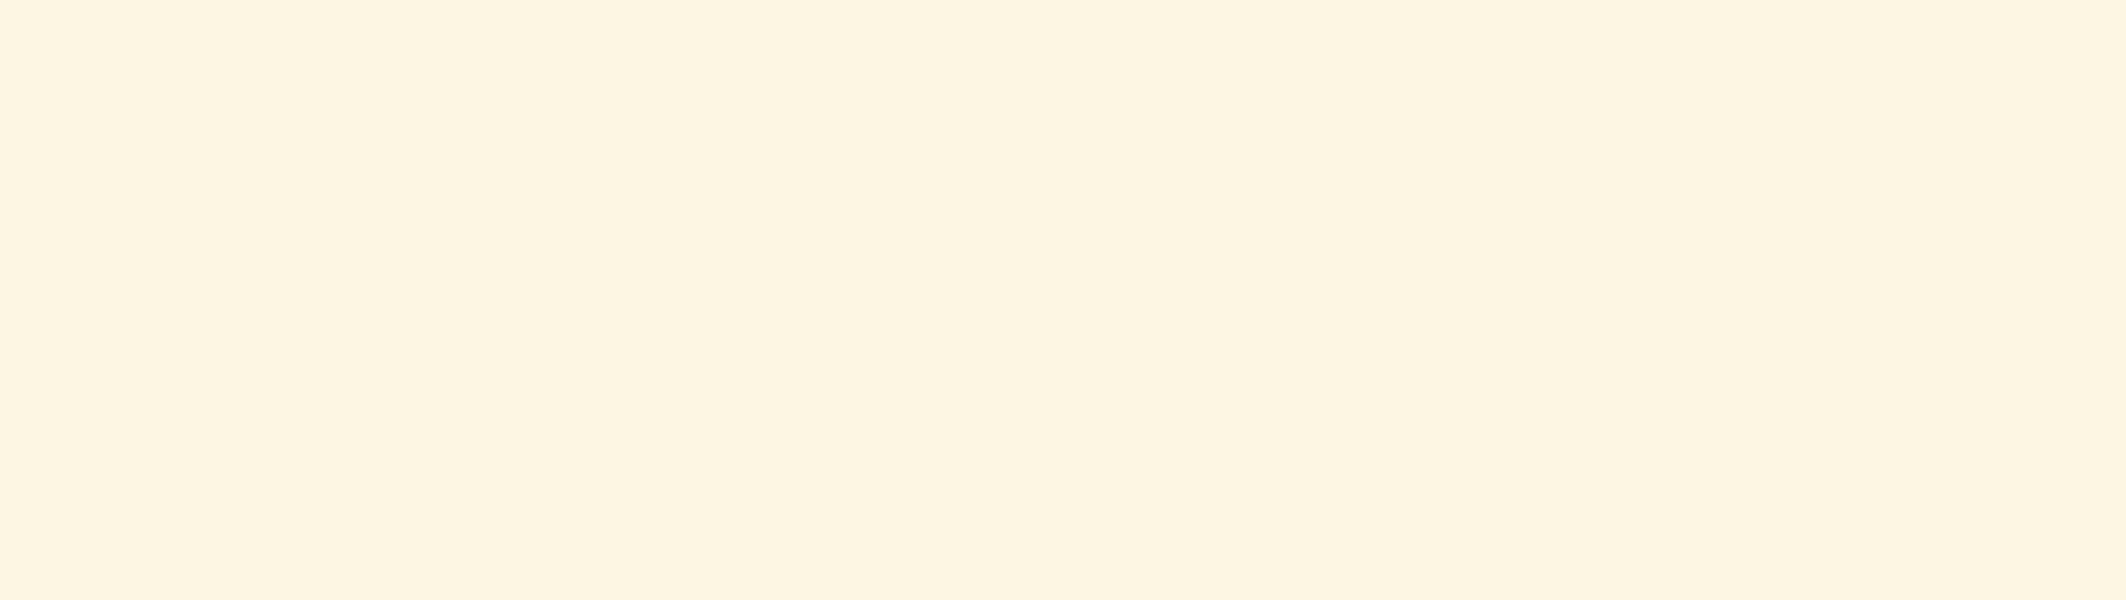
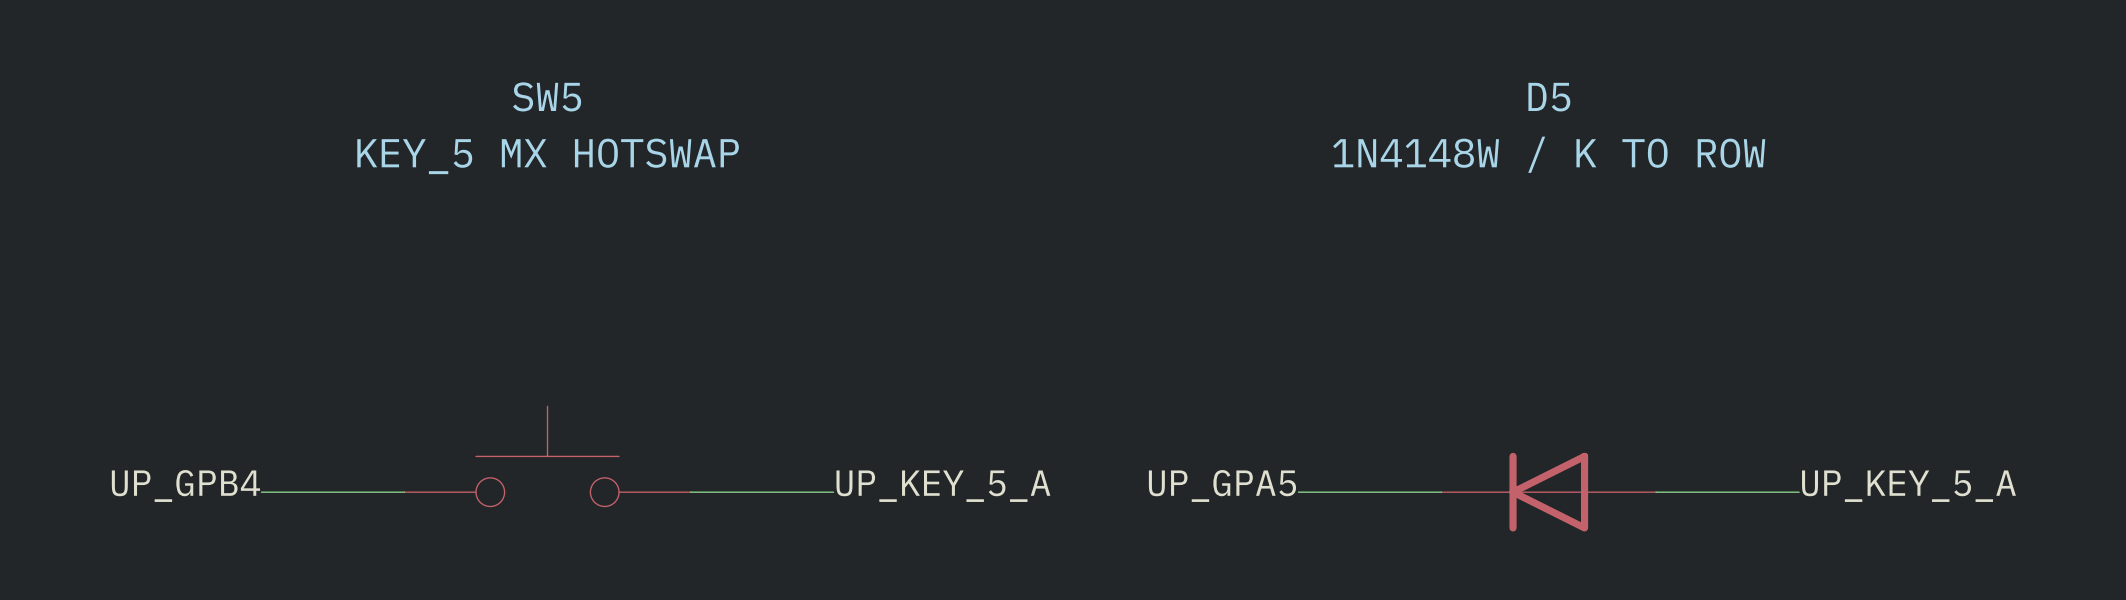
SW5: none -> KEY_5 MX HOTSWAP (547, 456)
label: none -> UP_GPB4 (185, 485)
label: none -> UP_KEY_5_A (943, 486)
label: none -> UP_GPA5 (1222, 485)
label: none -> UP_KEY_5_A (1908, 486)
wire: none -> (261, 492) (404, 492)
wire: none -> (690, 492) (833, 492)
wire: none -> (1298, 492) (1441, 492)
D5: none -> 1N4148W / K TO ROW (1548, 492)
wire: none -> (1656, 492) (1799, 492)

